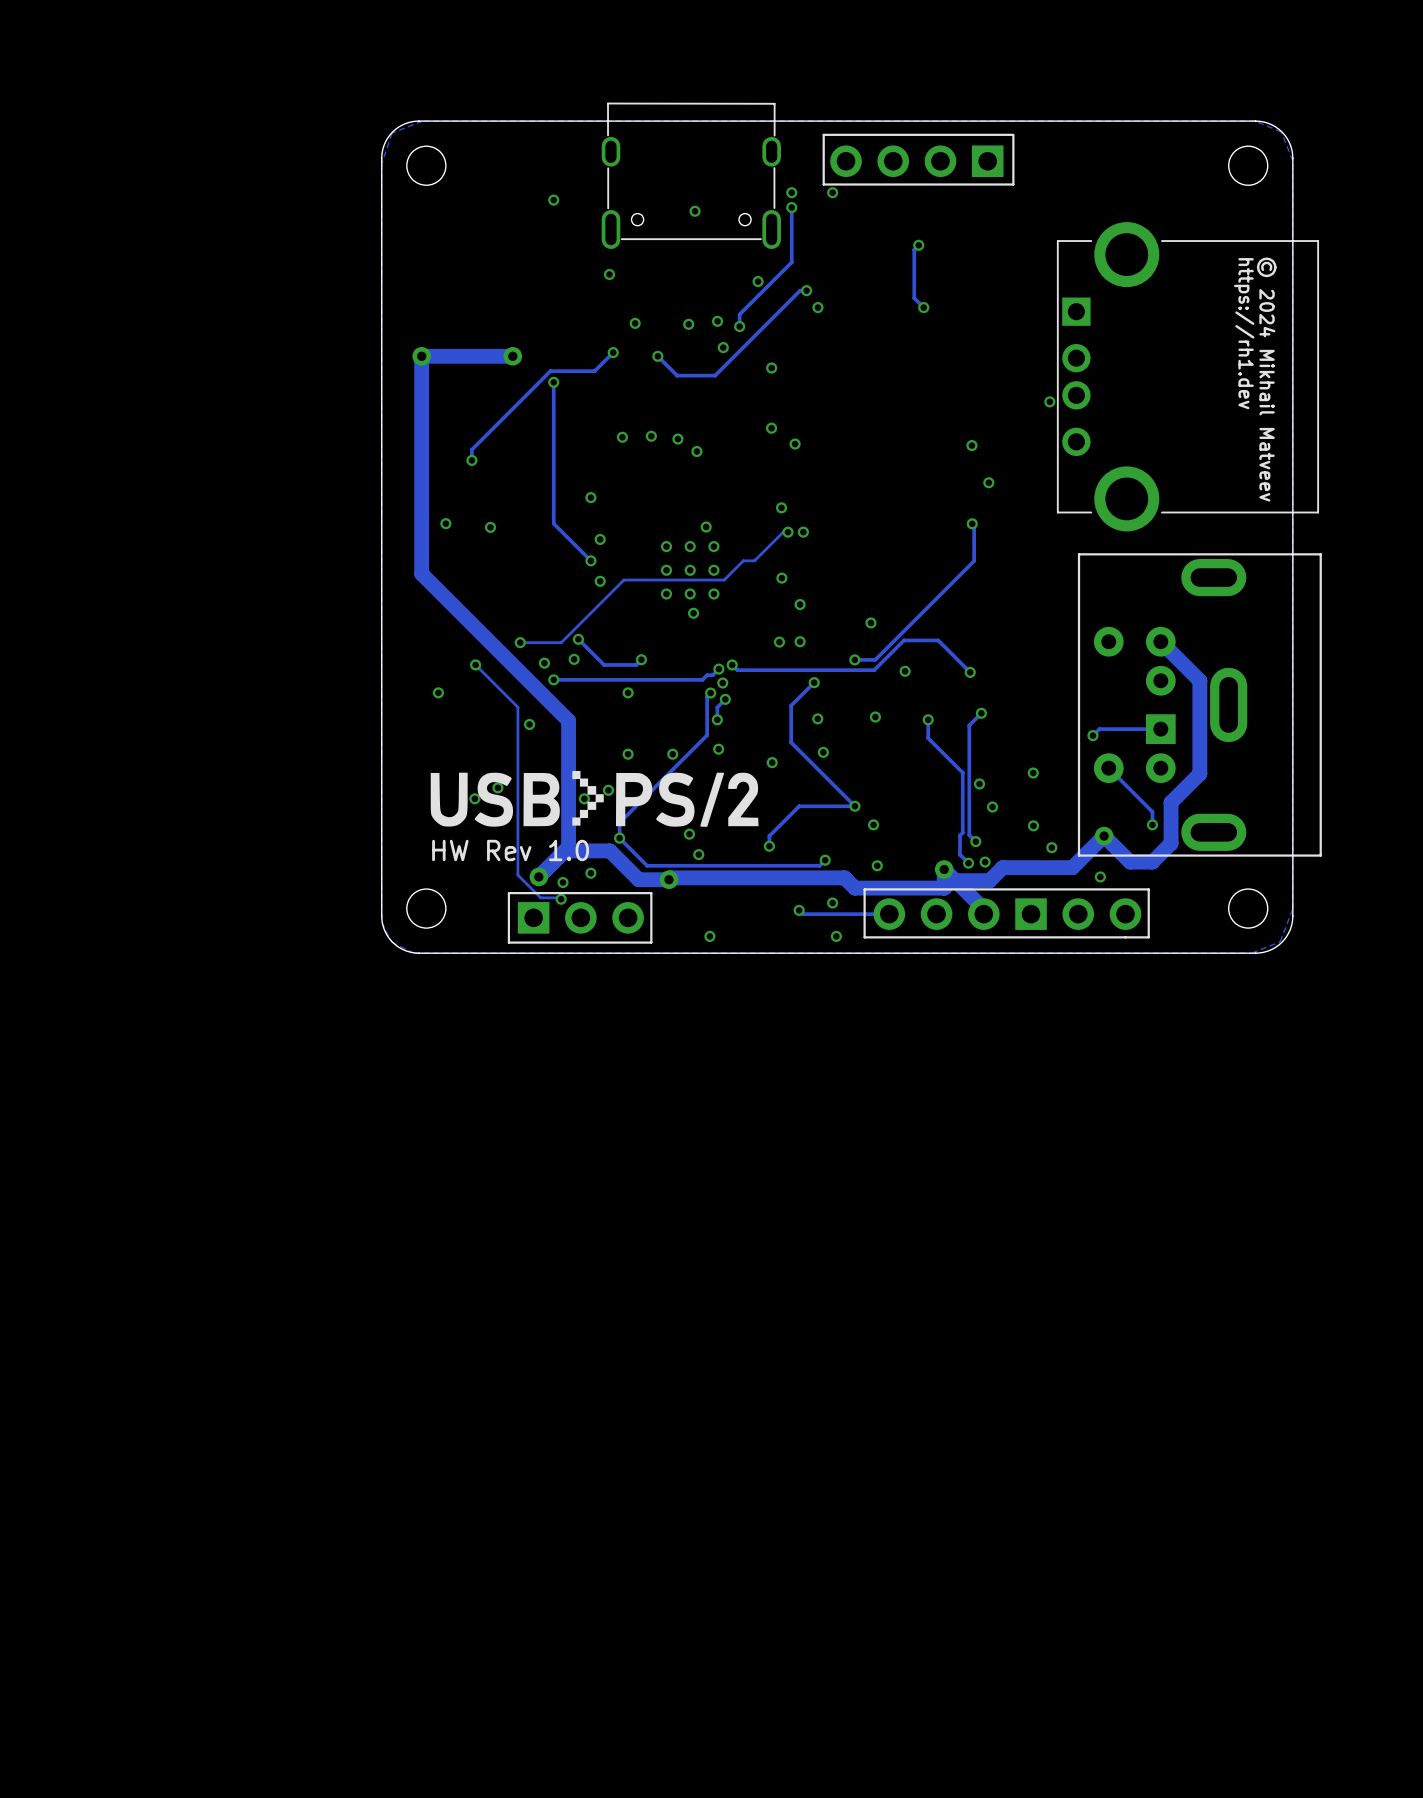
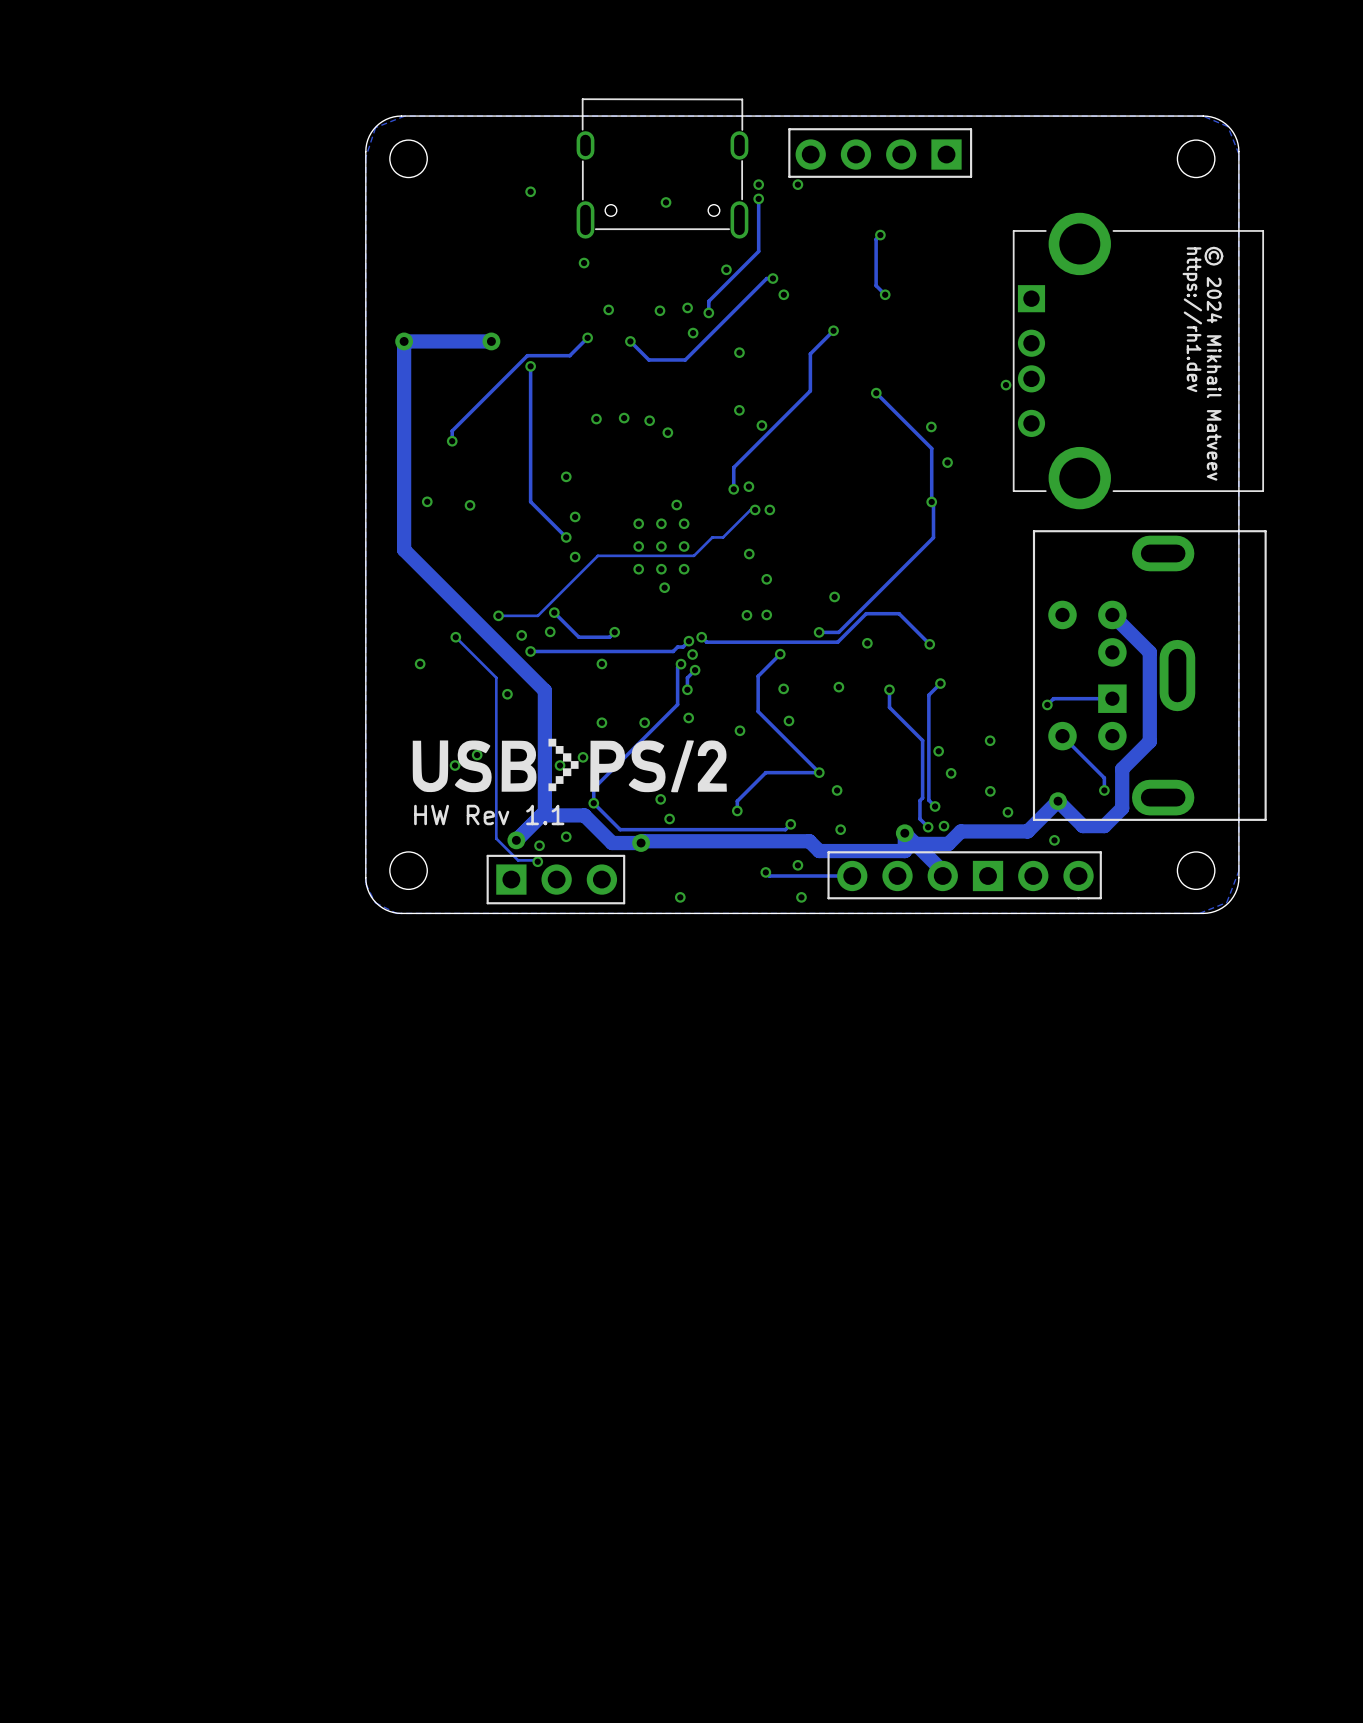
track: none -> (833, 330) (810, 353) (810, 390) (733, 467) (733, 489)
via: none -> (833, 330)
track: none -> (876, 393) (931, 448) (931, 501)
via: none -> (876, 393)
via: none -> (733, 489)
text: HW Rev 1.0 (510, 850) -> HW Rev 1.1 (489, 815)

